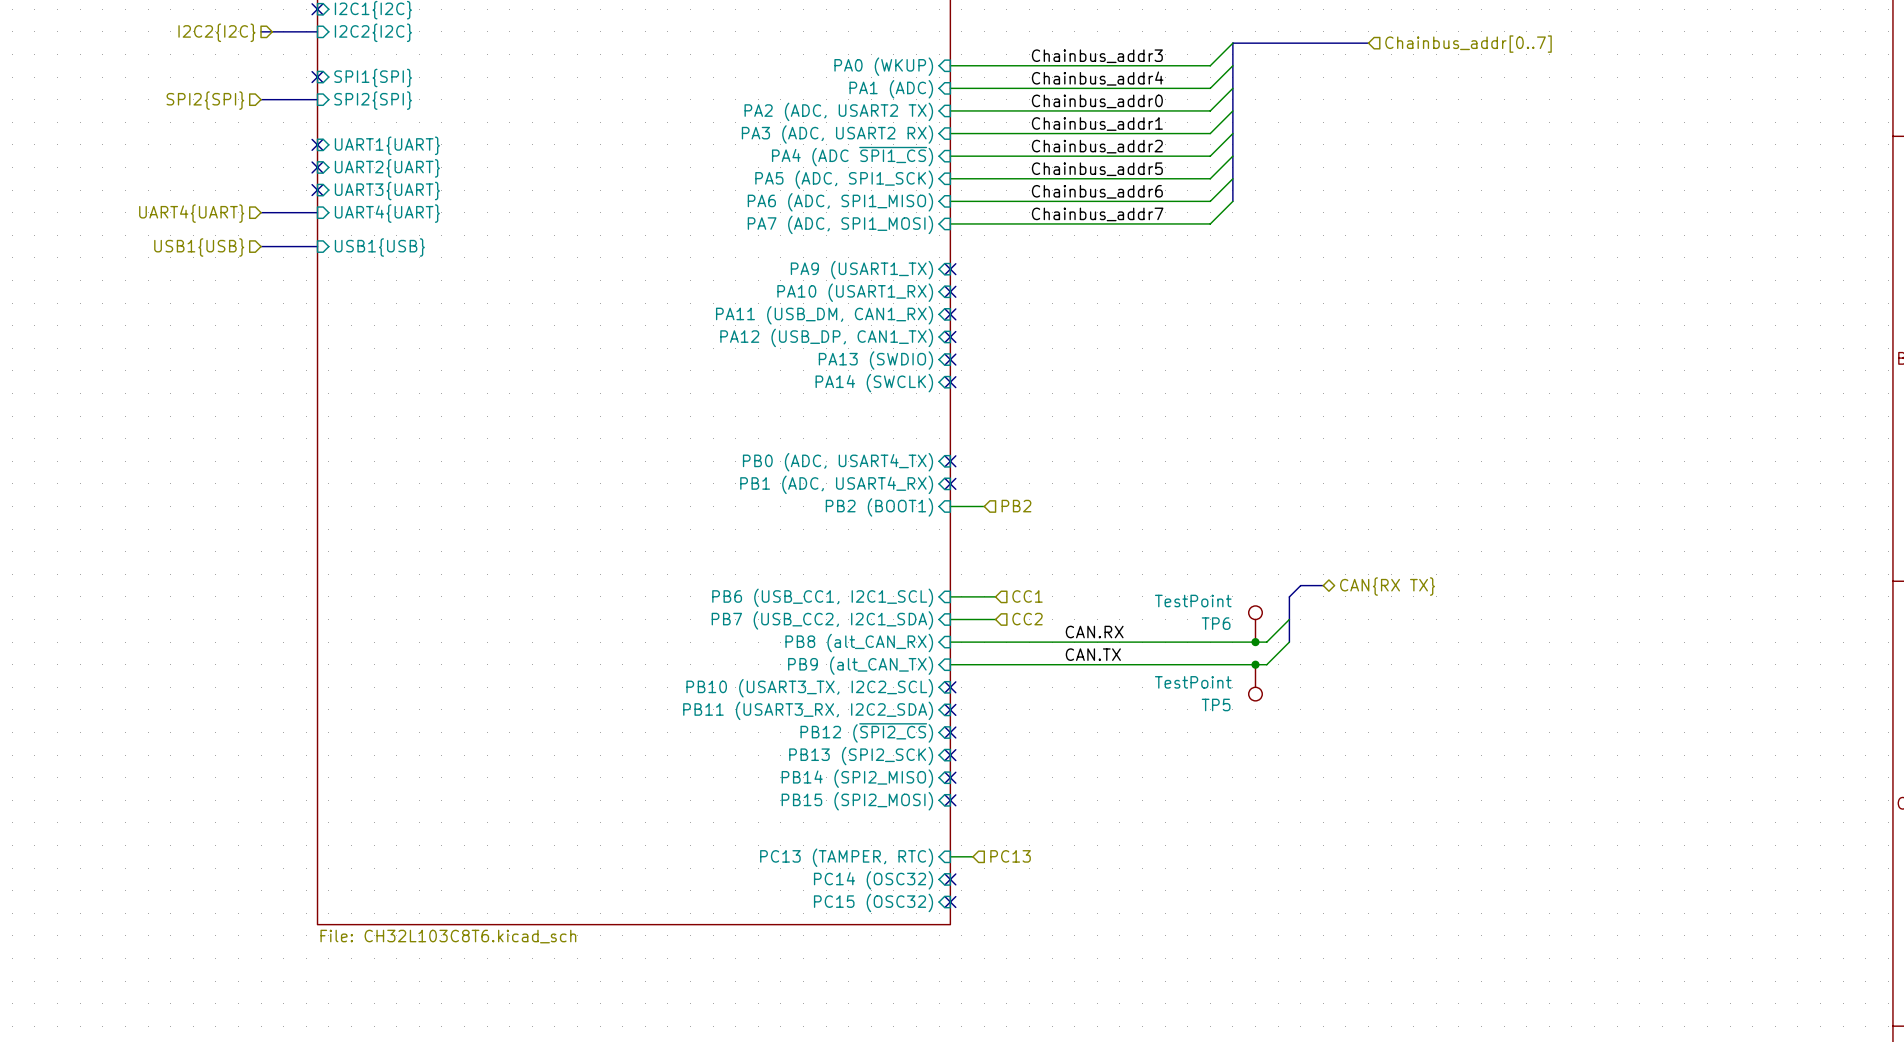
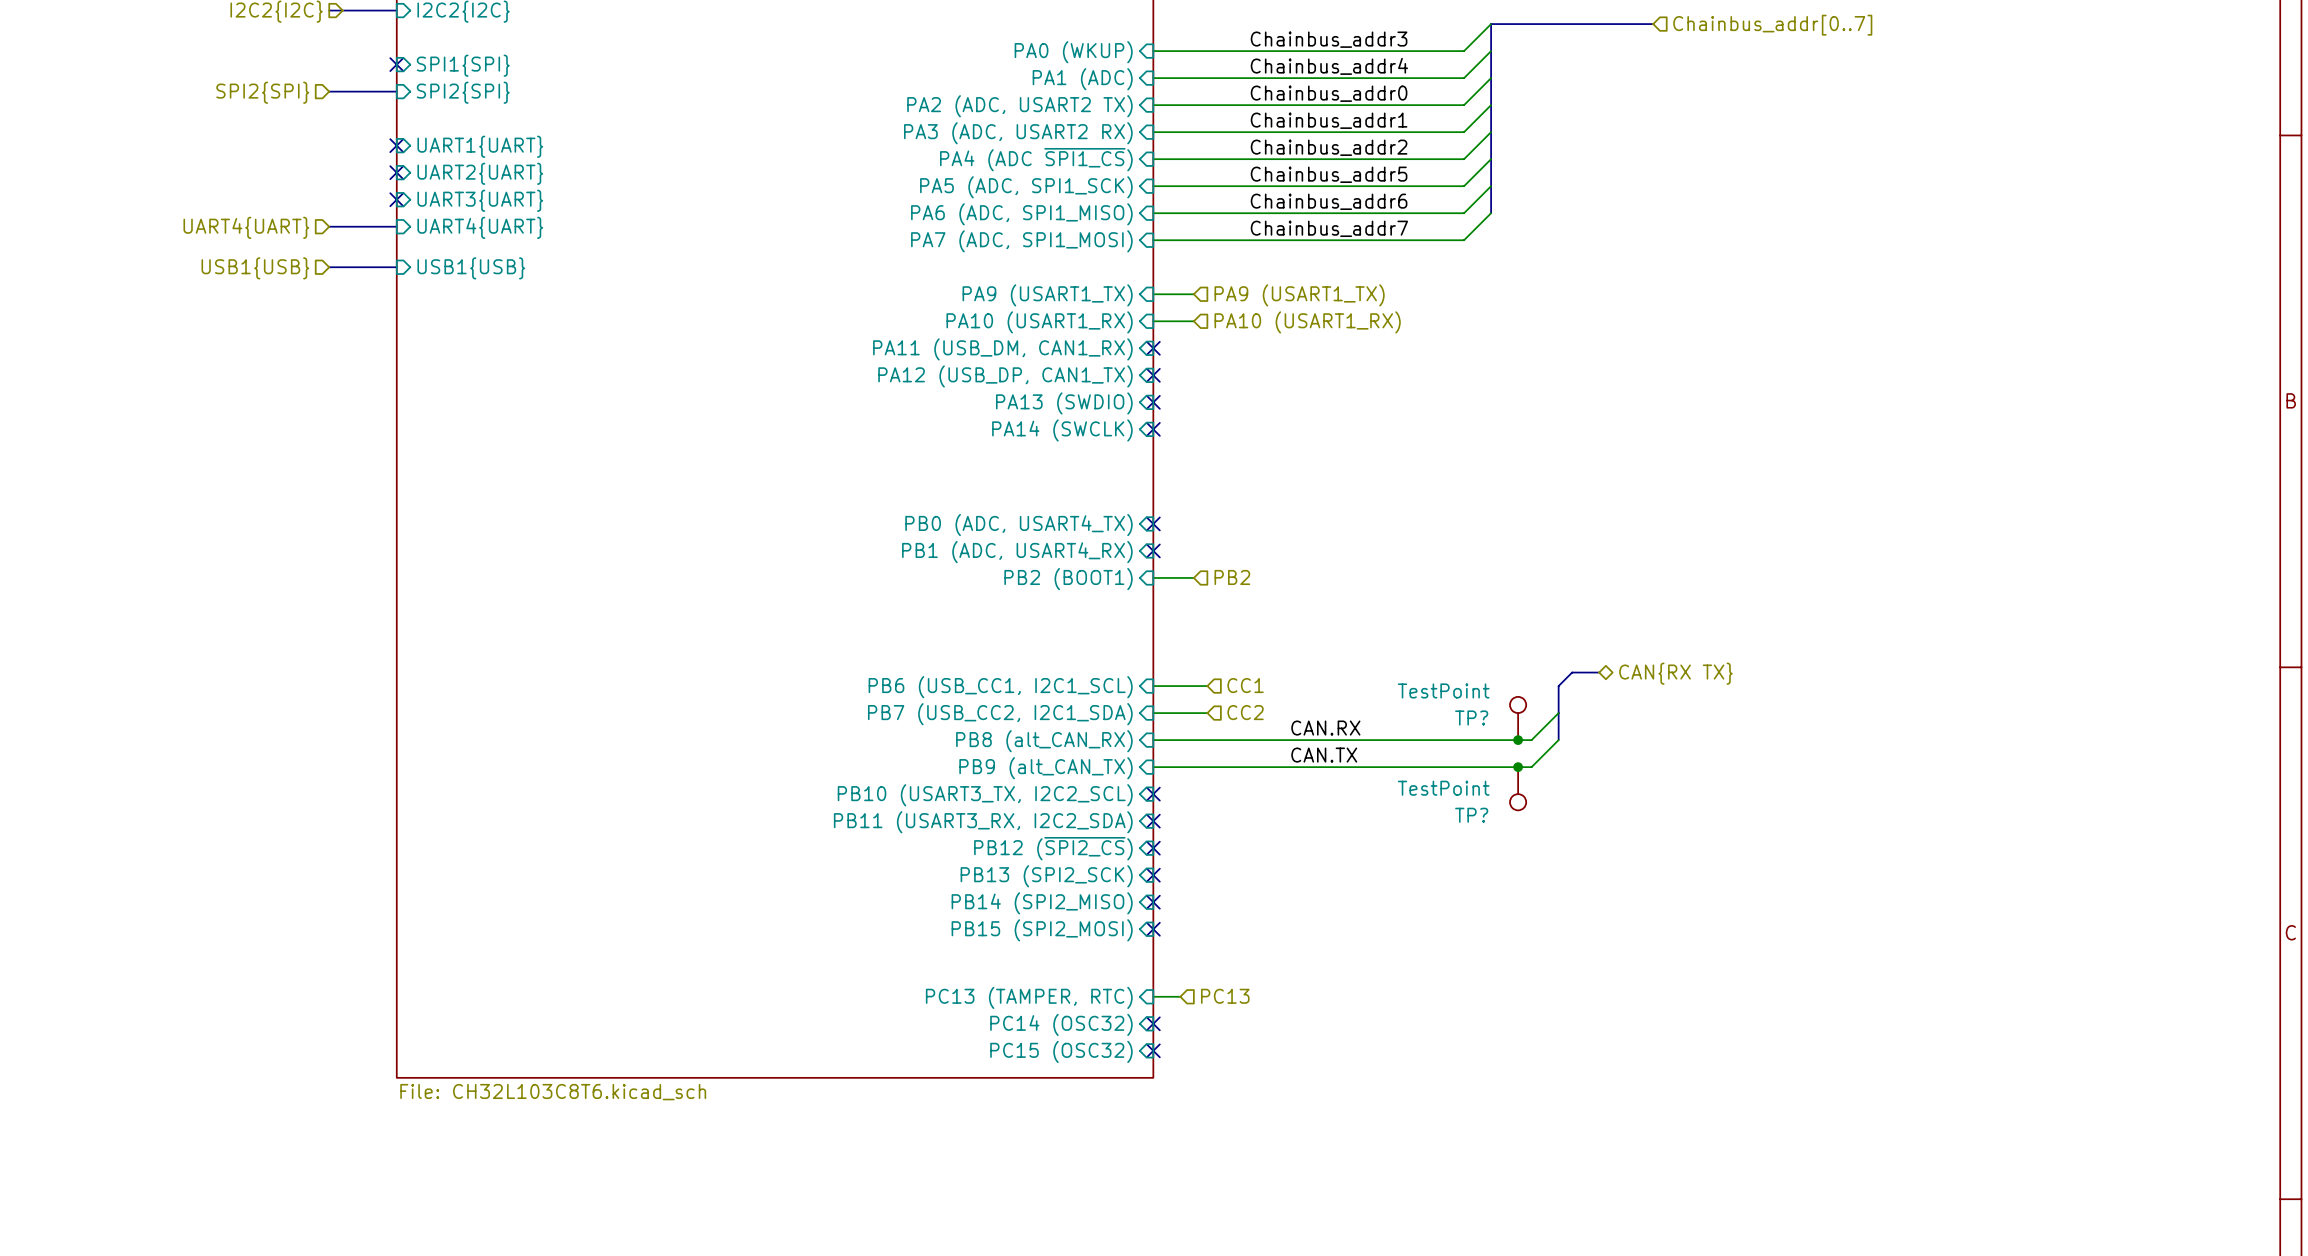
wire: none -> (1153, 294) (1193, 294)
no-connect mark: (950, 269) -> none
hierarchical label: none -> PA9 (USART1_TX) (1299, 295)
wire: none -> (1153, 321) (1193, 321)
no-connect mark: (950, 291) -> none
hierarchical label: none -> PA10 (USART1_RX) (1307, 322)
TP6 name: TP6 (1216, 623) -> TP? (1471, 717)
TP5 name: TP5 (1216, 704) -> TP? (1471, 815)

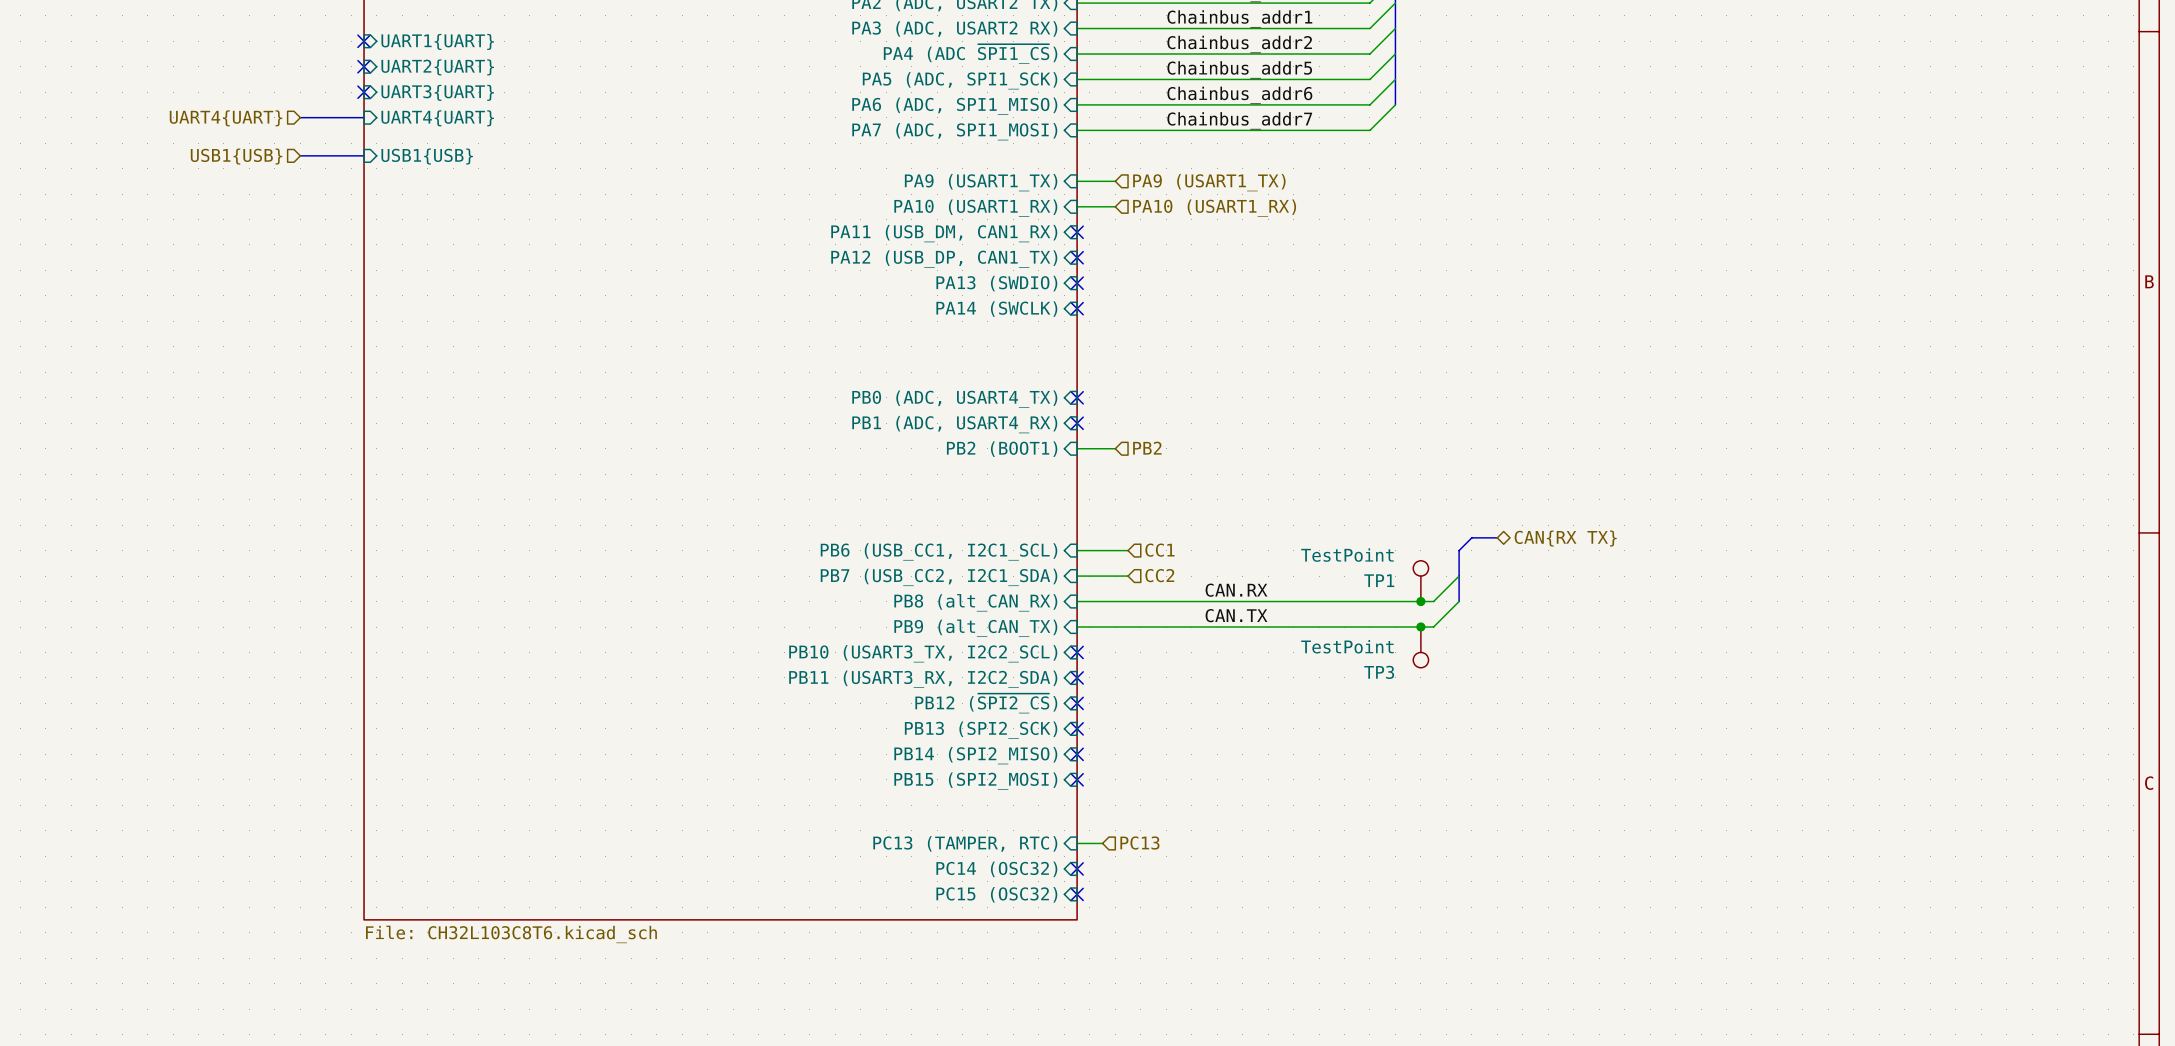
TP? name: TP? (1471, 717) -> TP1 (1379, 580)
TP? name: TP? (1471, 815) -> TP3 (1379, 672)

